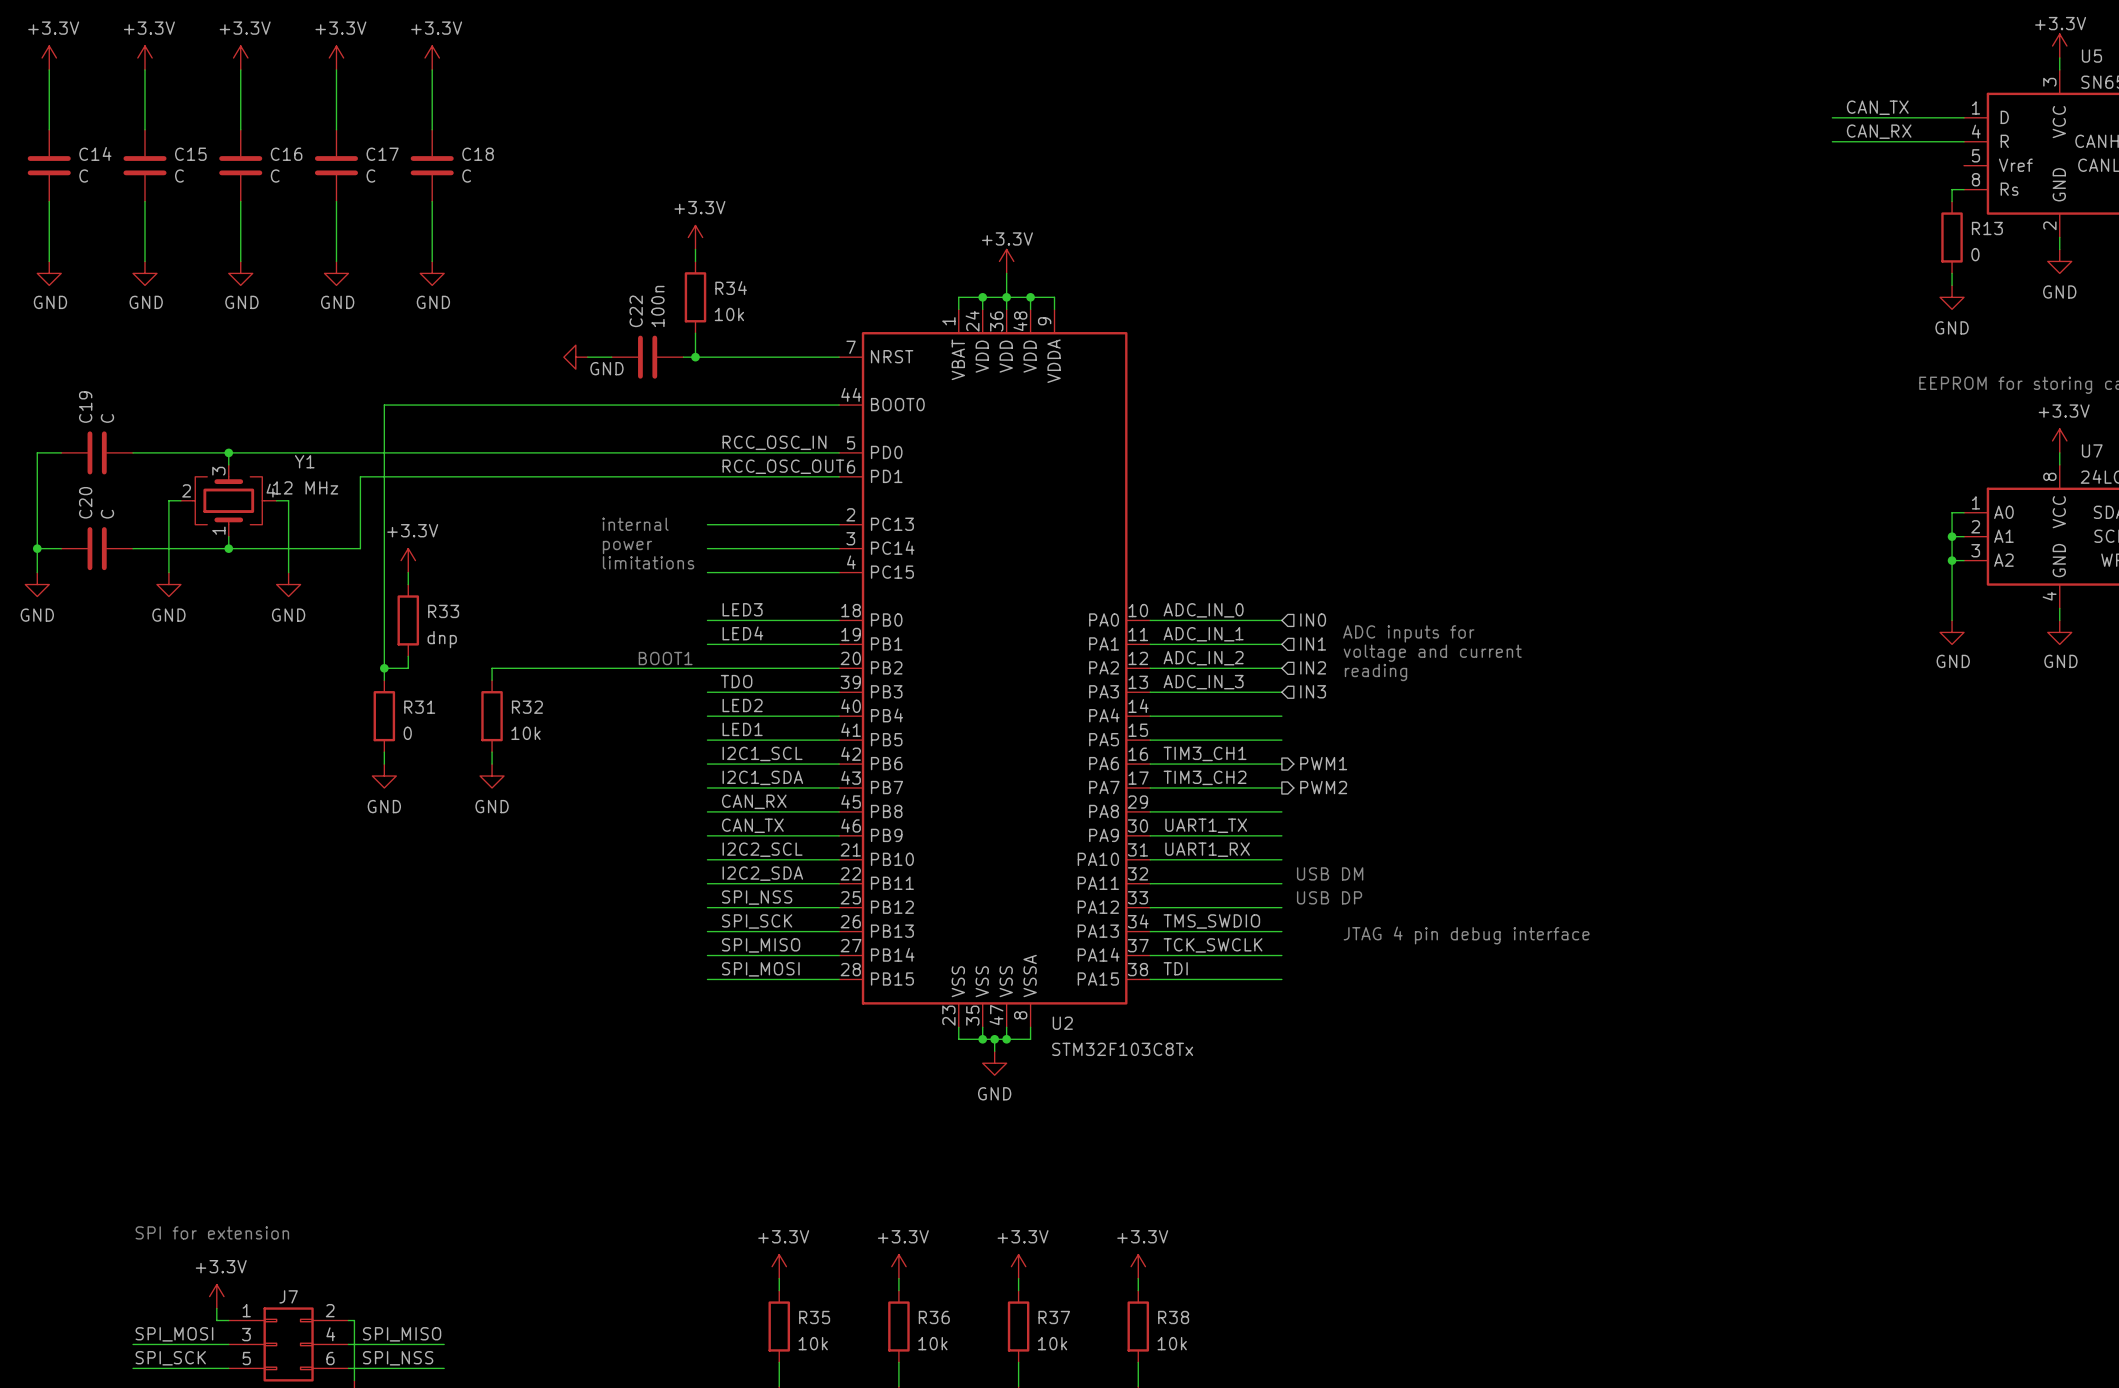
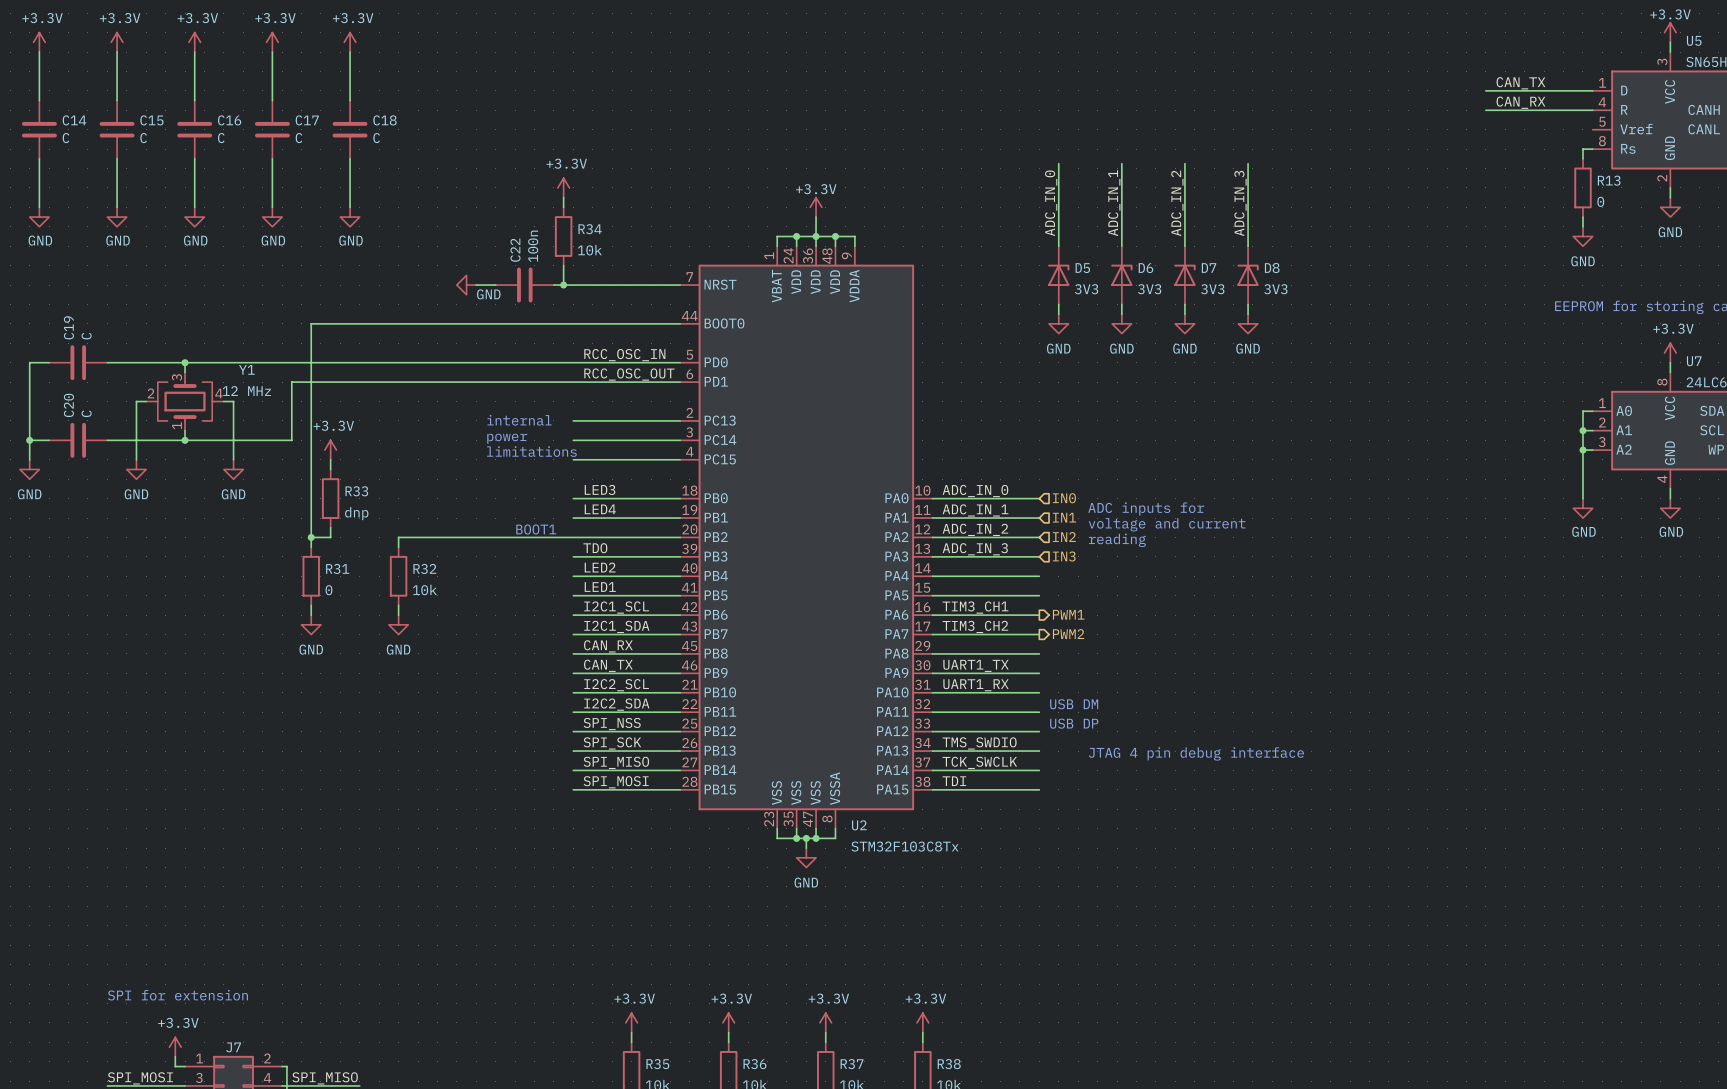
wire: none -> (1058, 163) (1058, 246)
wire: none -> (1121, 163) (1121, 246)
wire: none -> (1184, 163) (1184, 246)
wire: none -> (1248, 163) (1248, 246)
label: none -> ADC_IN_0 (1051, 203)
label: none -> ADC_IN_1 (1114, 203)
label: none -> ADC_IN_2 (1177, 203)
label: none -> ADC_IN_3 (1240, 203)
D5: none -> 3V3 (1058, 275)
D6: none -> 3V3 (1121, 275)
D7: none -> 3V3 (1184, 275)
D8: none -> 3V3 (1248, 275)
wire: none -> (1058, 304) (1058, 314)
wire: none -> (1121, 304) (1121, 314)
wire: none -> (1184, 304) (1184, 314)
wire: none -> (1248, 304) (1248, 314)
power symbol: none -> GND (1058, 323)
power symbol: none -> GND (1121, 323)
power symbol: none -> GND (1184, 323)
power symbol: none -> GND (1248, 323)

